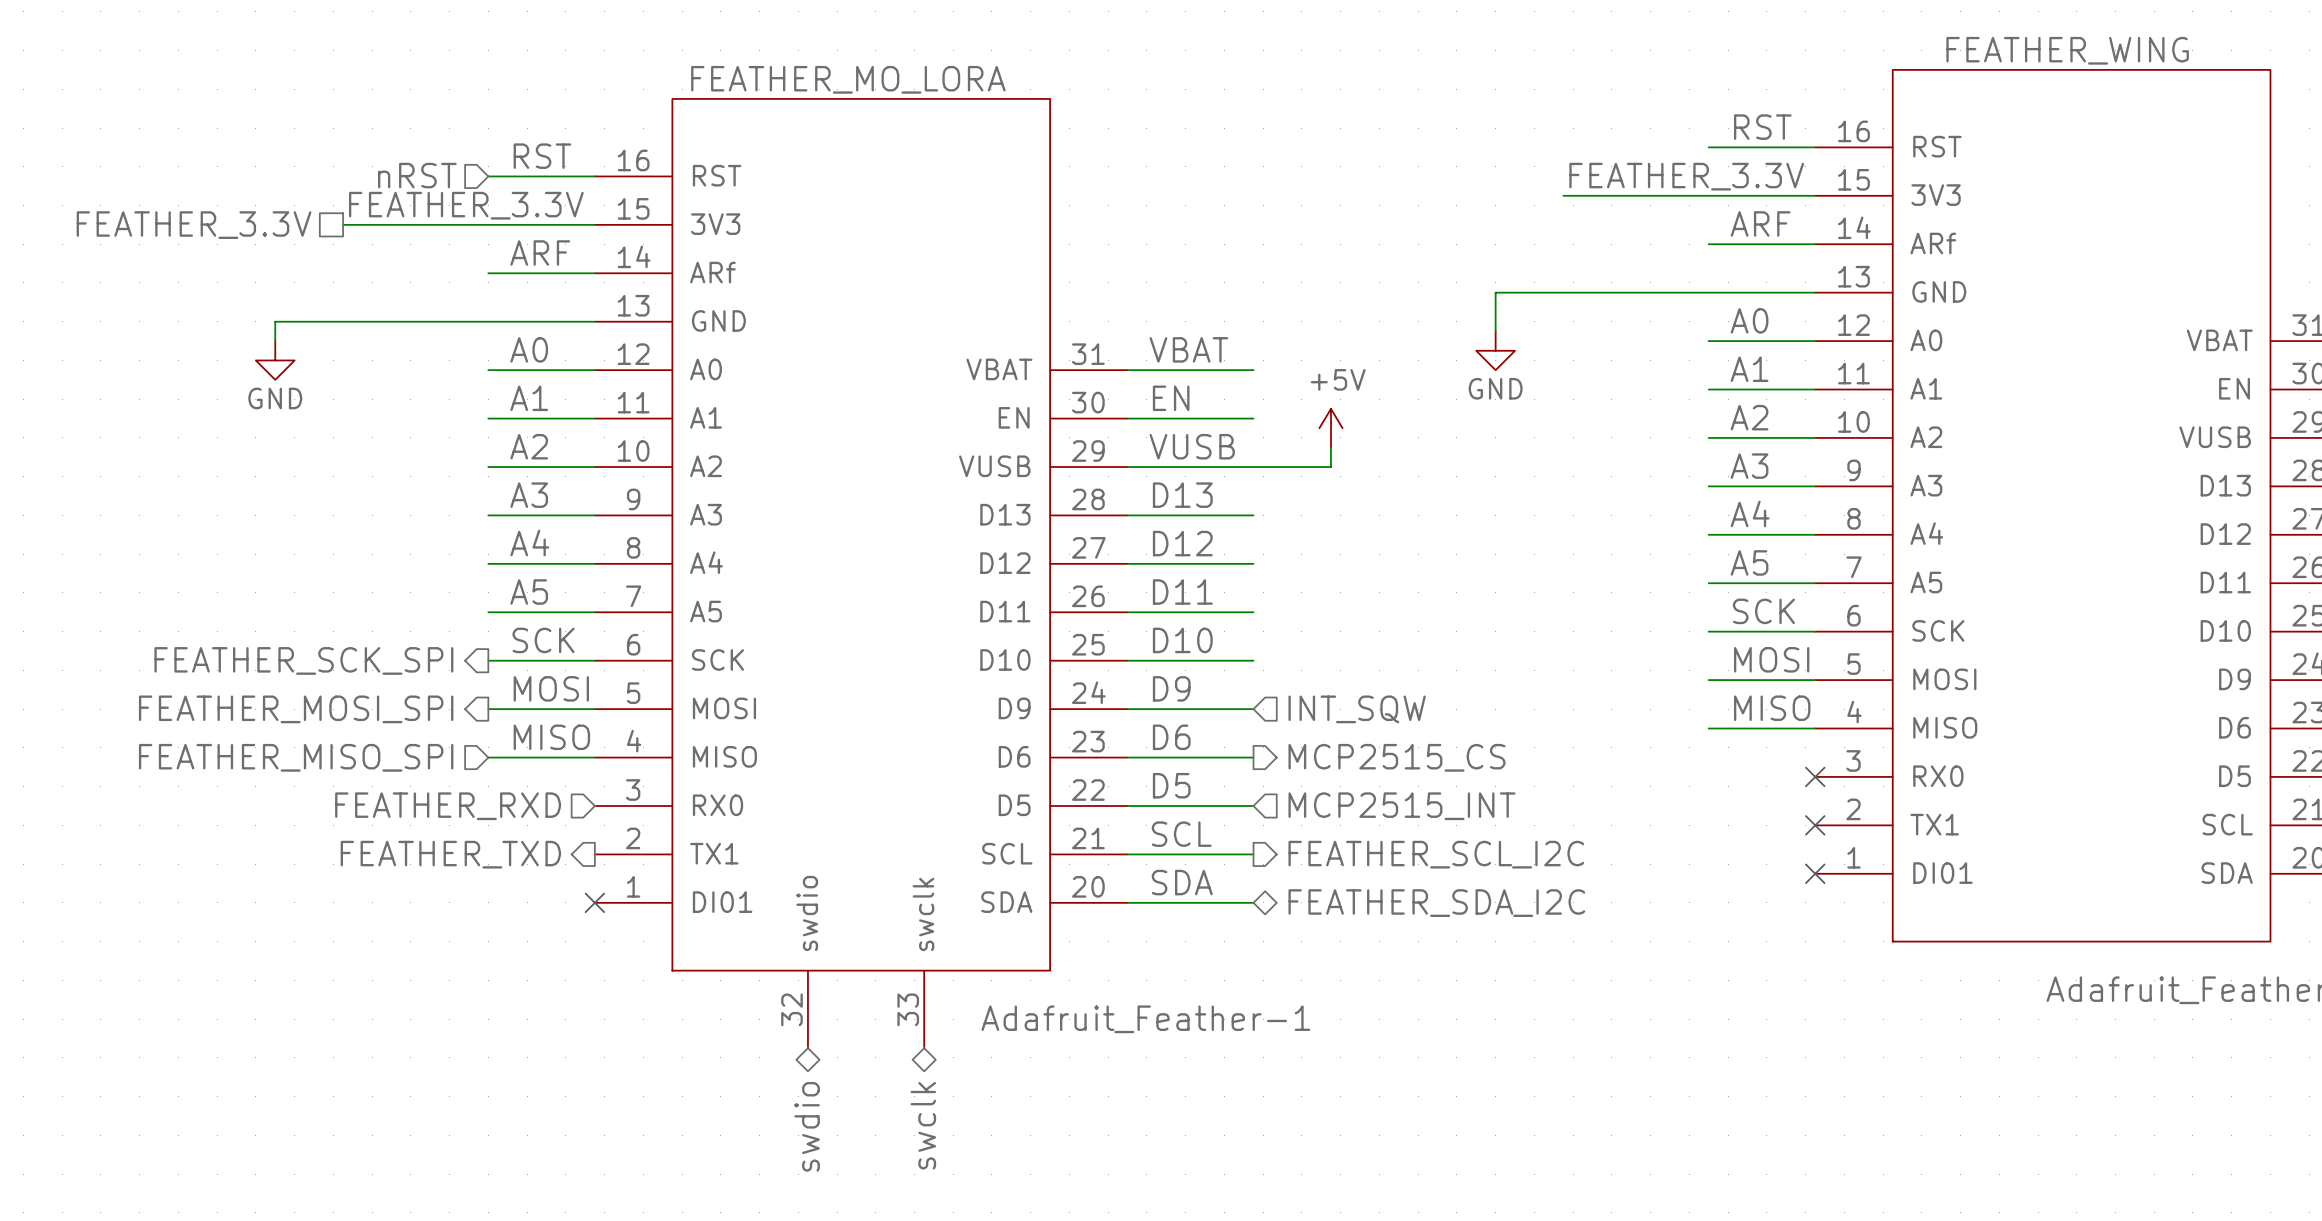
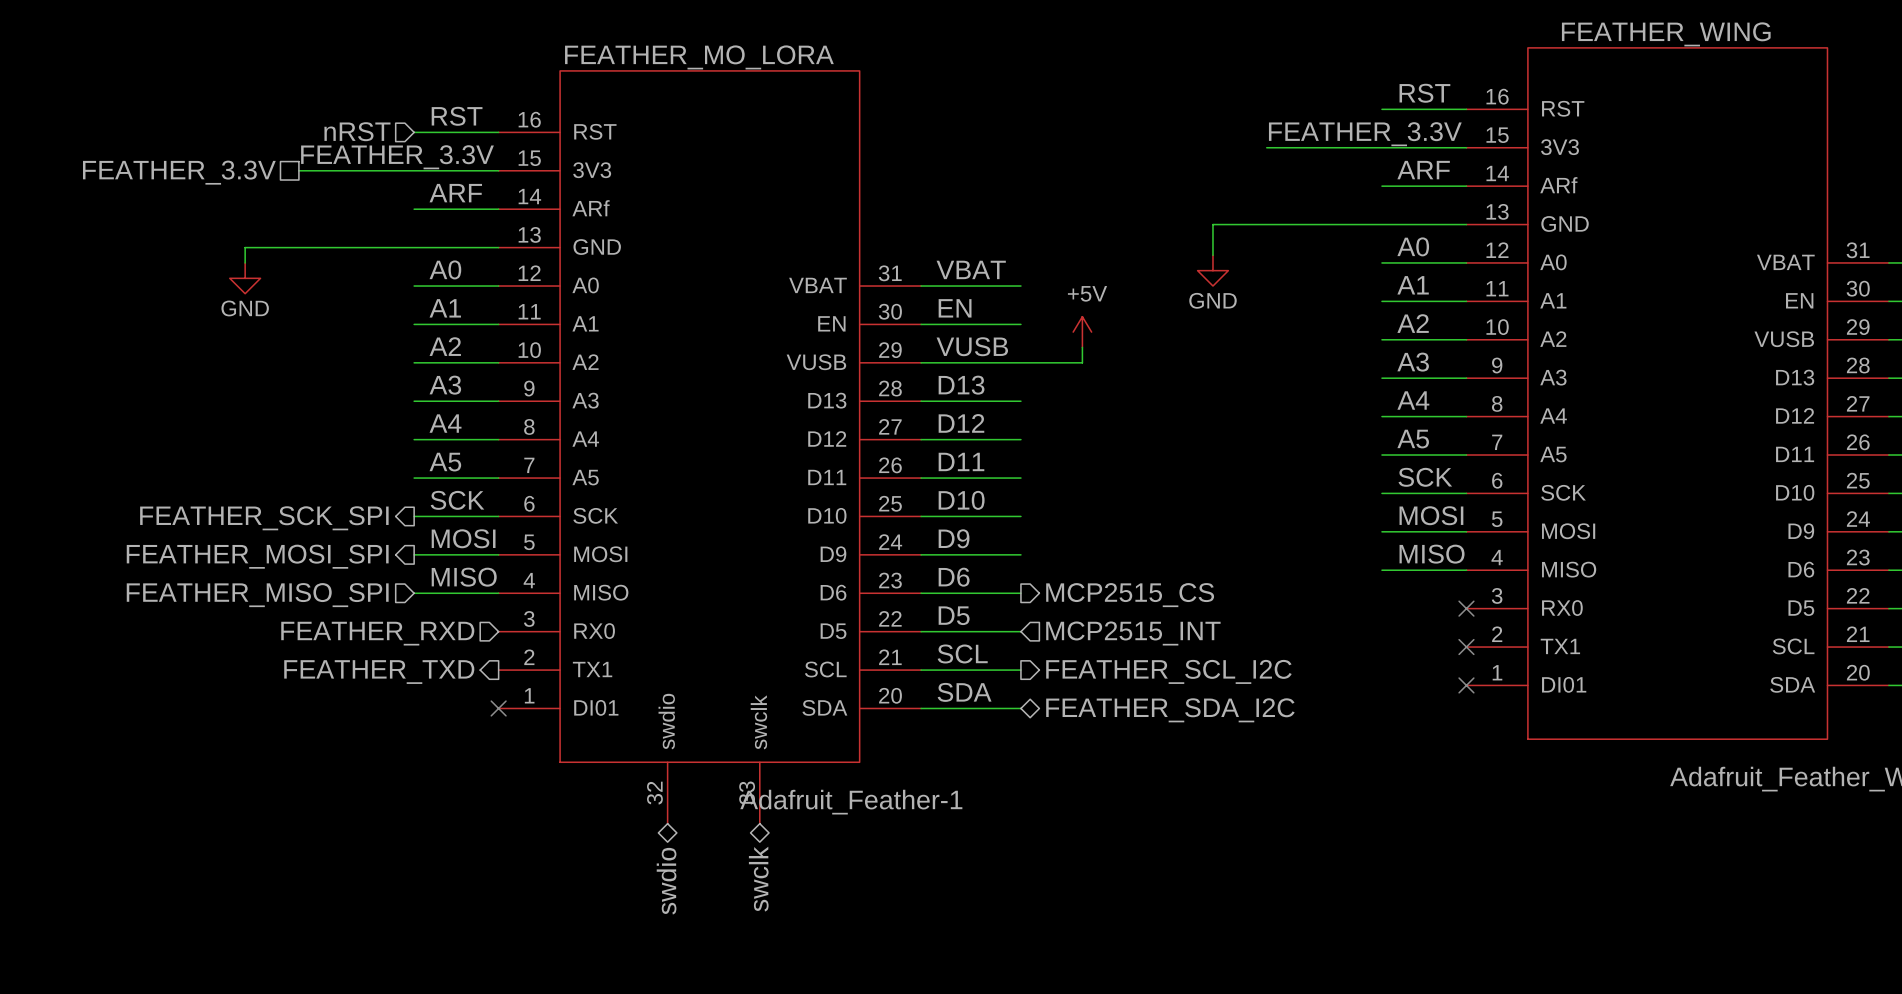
hierarchical label: INT_SQW (1357, 709) -> none
Adafruit_Feather-1 name position: Adafruit_Feather-1 (1145, 1019) -> Adafruit_Feather-1 (851, 802)

